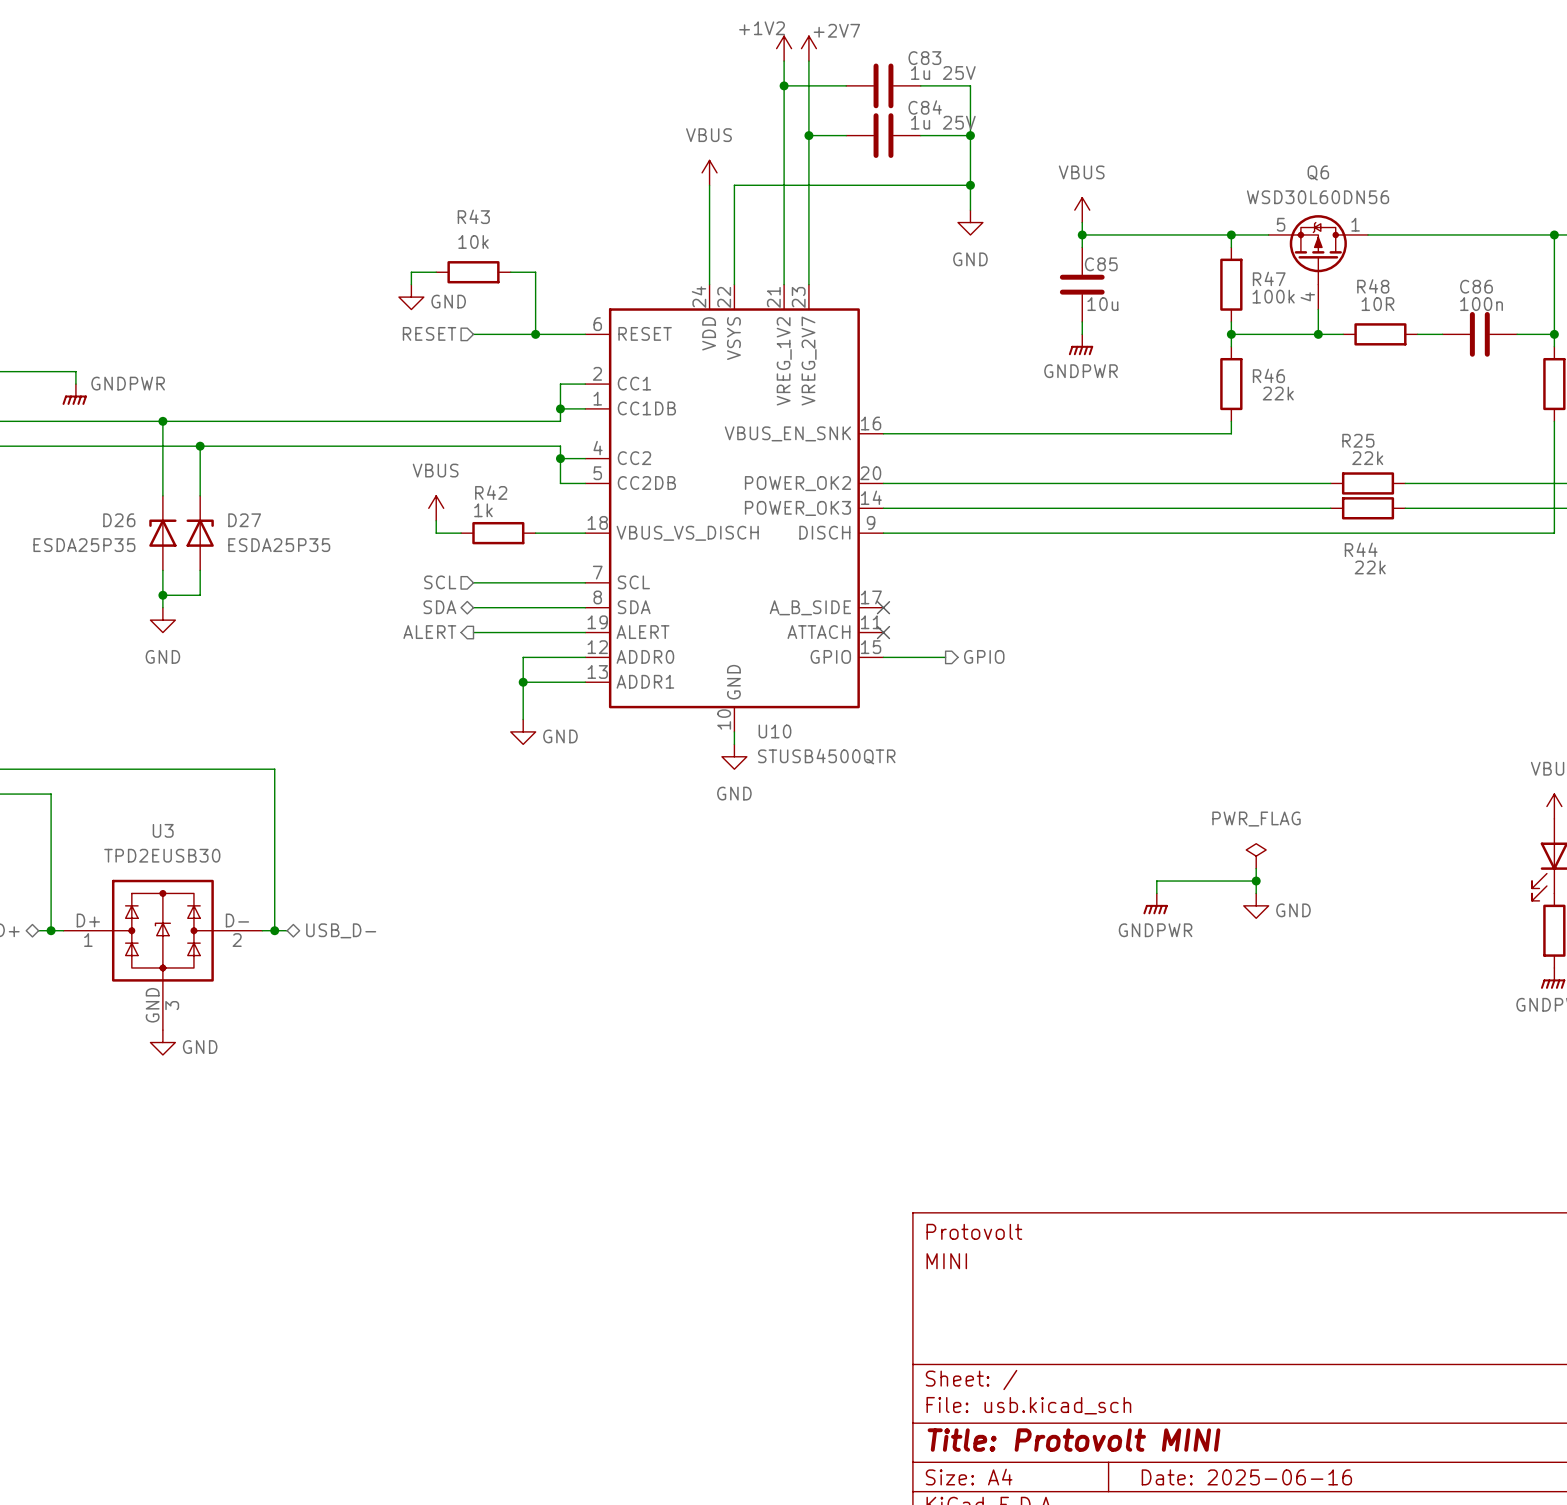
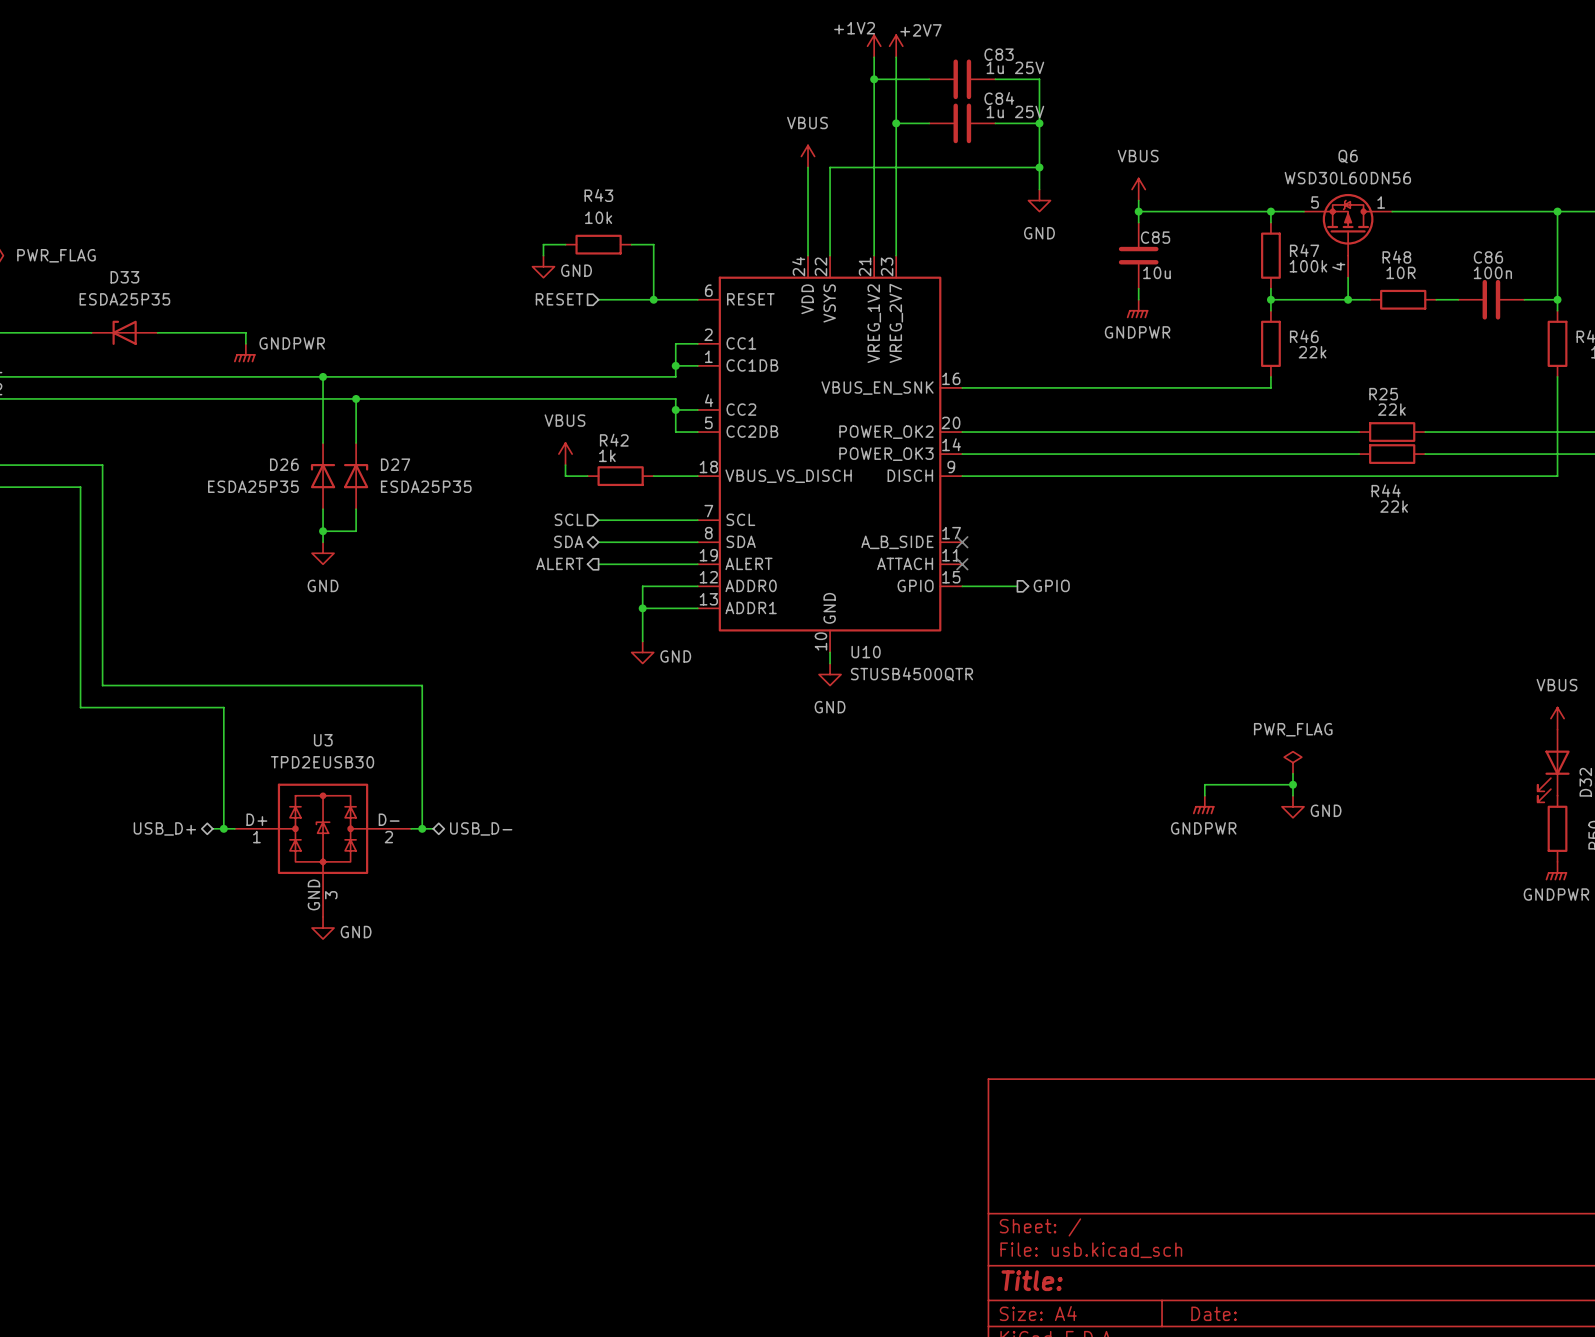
title block: Protovolt (974, 1231) -> none
title block: MINI (946, 1261) -> none
title block: Title: Protovolt MINI (1074, 1440) -> Title: (1032, 1280)
title block: Date: 2025-06-16 (1246, 1477) -> Date: (1214, 1313)

